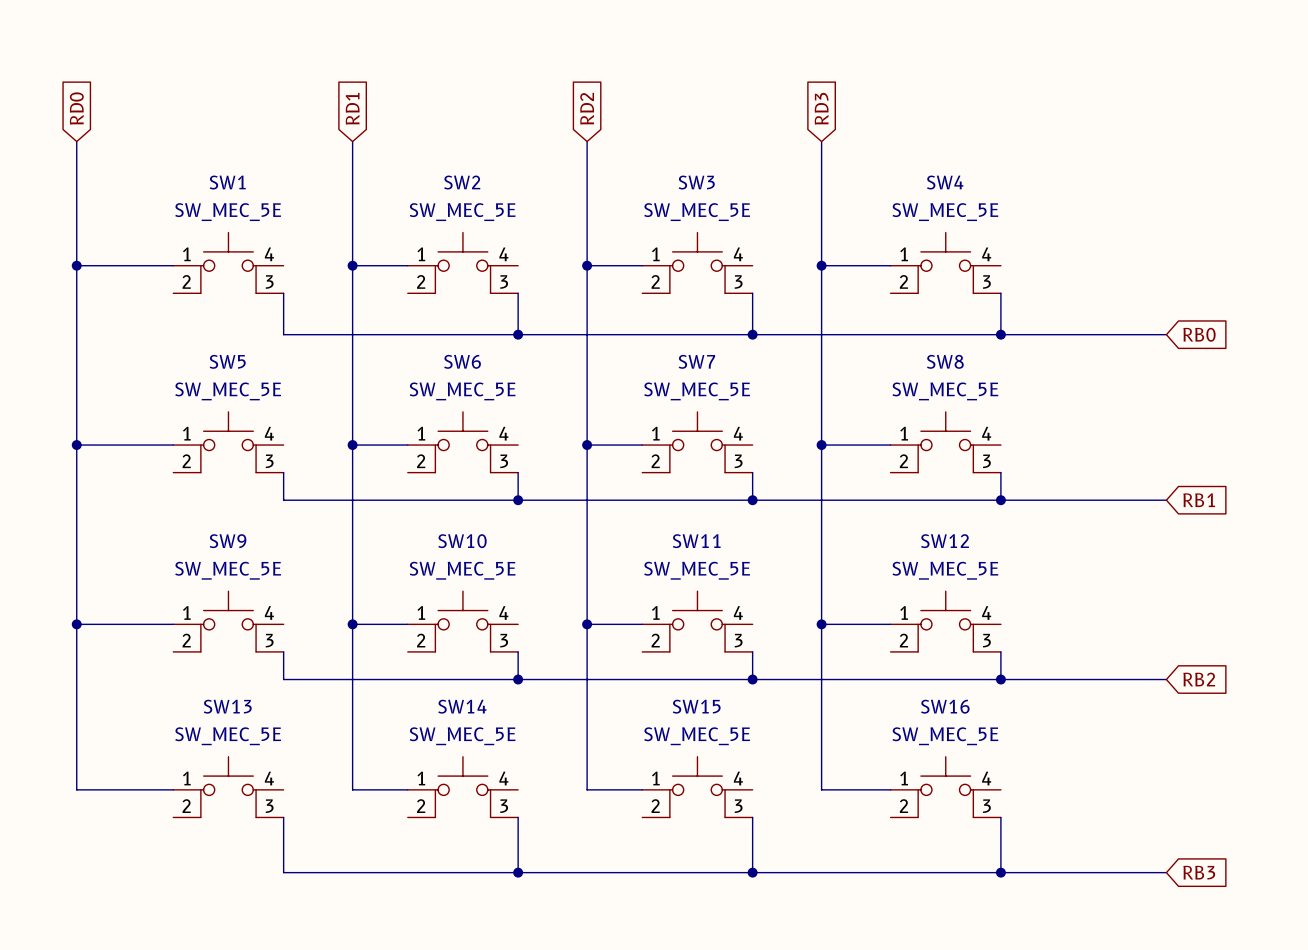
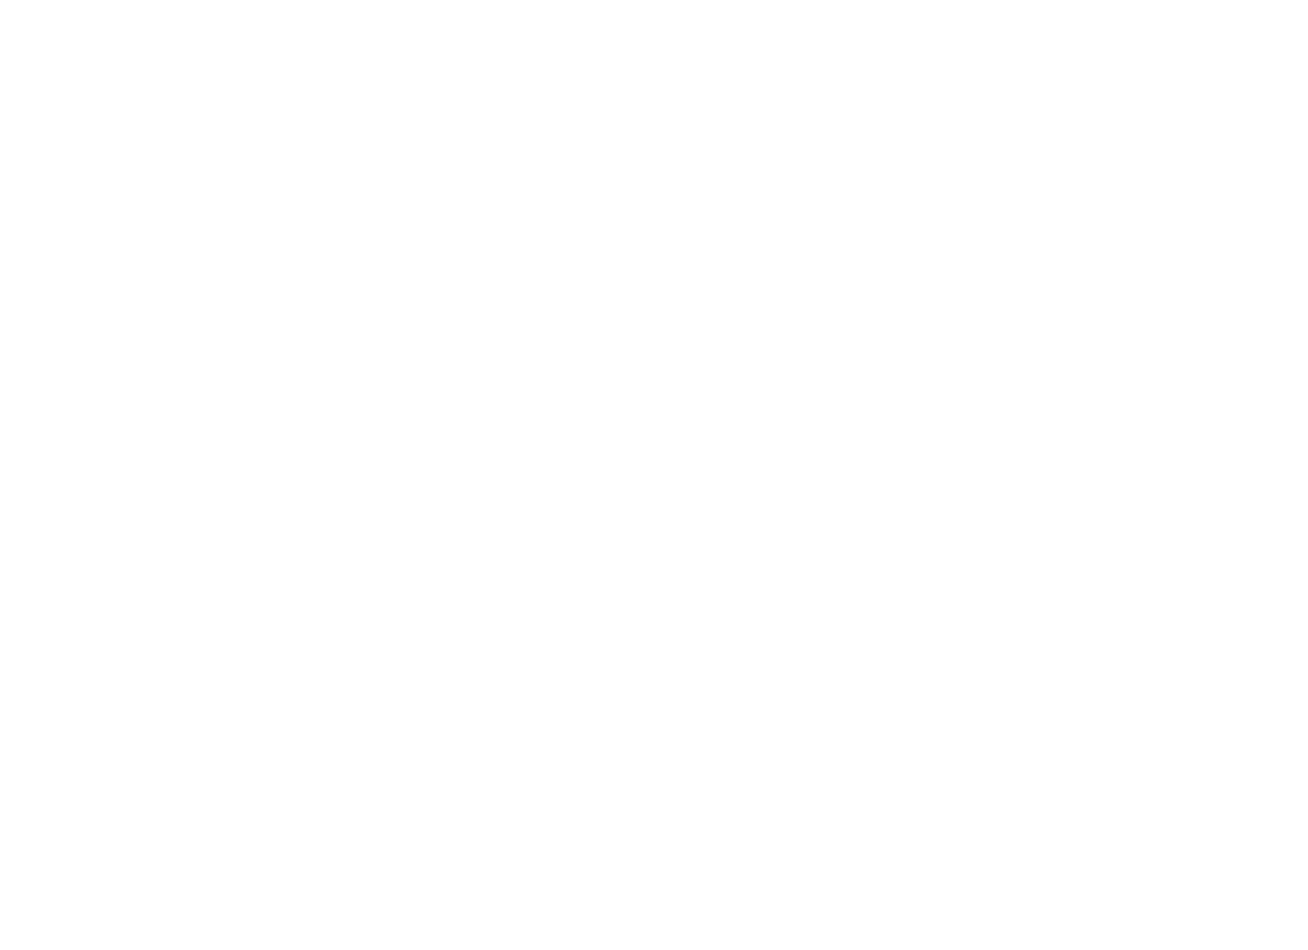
global label: RD0 (76, 108) -> none
global label: RD1 (352, 108) -> none
global label: RD2 (587, 108) -> none
global label: RD3 (821, 108) -> none
wire: (76, 141) (76, 789) (173, 789) -> none
wire: (352, 141) (352, 789) (407, 789) -> none
wire: (587, 141) (587, 789) (642, 789) -> none
wire: (821, 141) (821, 789) (890, 789) -> none
SW1: SW_MEC_5E (228, 262) -> none
SW2: SW_MEC_5E (462, 262) -> none
SW3: SW_MEC_5E (697, 262) -> none
SW4: SW_MEC_5E (945, 262) -> none
wire: (76, 265) (173, 265) -> none
junction: (76, 265) -> none
wire: (352, 265) (407, 265) -> none
junction: (352, 265) -> none
wire: (587, 265) (642, 265) -> none
junction: (587, 265) -> none
wire: (821, 265) (890, 265) -> none
junction: (821, 265) -> none
wire: (283, 293) (283, 334) (1166, 334) -> none
wire: (518, 293) (518, 334) -> none
wire: (752, 293) (752, 334) -> none
wire: (1000, 293) (1000, 334) -> none
junction: (518, 334) -> none
junction: (752, 334) -> none
junction: (1000, 334) -> none
global label: RB0 (1199, 334) -> none
SW5: SW_MEC_5E (228, 442) -> none
SW6: SW_MEC_5E (462, 442) -> none
SW7: SW_MEC_5E (697, 442) -> none
SW8: SW_MEC_5E (945, 442) -> none
wire: (76, 445) (173, 445) -> none
junction: (76, 445) -> none
wire: (352, 445) (407, 445) -> none
junction: (352, 445) -> none
wire: (587, 445) (642, 445) -> none
junction: (587, 445) -> none
wire: (821, 445) (890, 445) -> none
junction: (821, 445) -> none
wire: (283, 472) (283, 500) (1166, 500) -> none
wire: (518, 472) (518, 500) -> none
wire: (752, 472) (752, 500) -> none
wire: (1000, 472) (1000, 500) -> none
junction: (518, 500) -> none
junction: (752, 500) -> none
junction: (1000, 500) -> none
global label: RB1 (1199, 500) -> none
SW9: SW_MEC_5E (228, 621) -> none
SW10: SW_MEC_5E (462, 621) -> none
SW11: SW_MEC_5E (697, 621) -> none
SW12: SW_MEC_5E (945, 621) -> none
wire: (76, 624) (173, 624) -> none
junction: (76, 624) -> none
wire: (352, 624) (407, 624) -> none
junction: (352, 624) -> none
wire: (587, 624) (642, 624) -> none
junction: (587, 624) -> none
wire: (821, 624) (890, 624) -> none
junction: (821, 624) -> none
wire: (283, 651) (283, 679) (1166, 679) -> none
wire: (518, 651) (518, 679) -> none
wire: (752, 651) (752, 679) -> none
wire: (1000, 651) (1000, 679) -> none
junction: (518, 679) -> none
junction: (752, 679) -> none
junction: (1000, 679) -> none
global label: RB2 (1199, 679) -> none
SW13: SW_MEC_5E (228, 787) -> none
SW14: SW_MEC_5E (462, 787) -> none
SW15: SW_MEC_5E (697, 787) -> none
SW16: SW_MEC_5E (945, 787) -> none
wire: (283, 817) (283, 872) (1166, 872) -> none
wire: (518, 817) (518, 872) -> none
wire: (752, 817) (752, 872) -> none
wire: (1000, 817) (1000, 872) -> none
junction: (518, 872) -> none
junction: (752, 872) -> none
junction: (1000, 872) -> none
global label: RB3 (1199, 872) -> none

